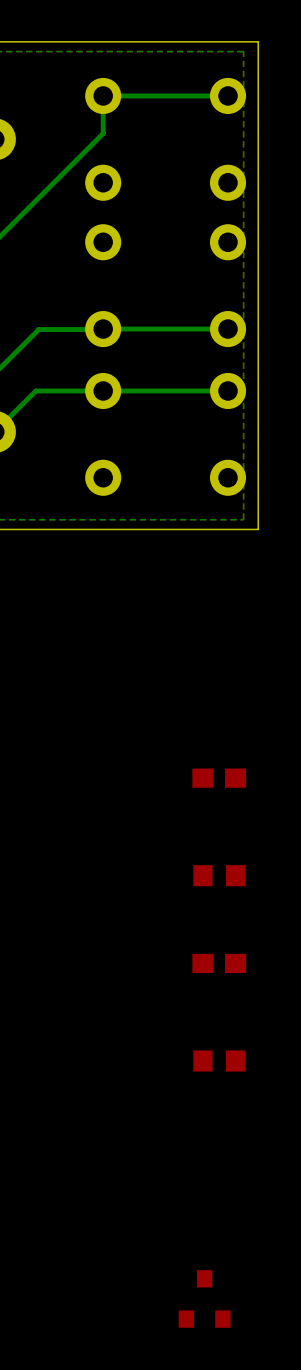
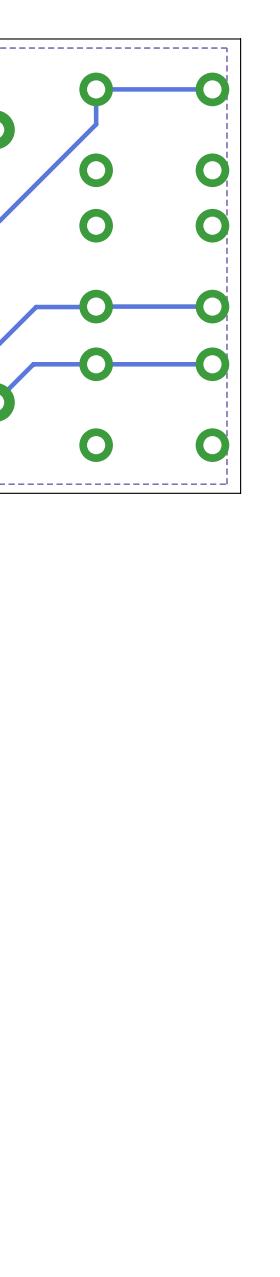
part: (219, 778) -> none
part: (219, 875) -> none
part: (219, 963) -> none
part: (219, 1060) -> none
part: (204, 1298) -> none

